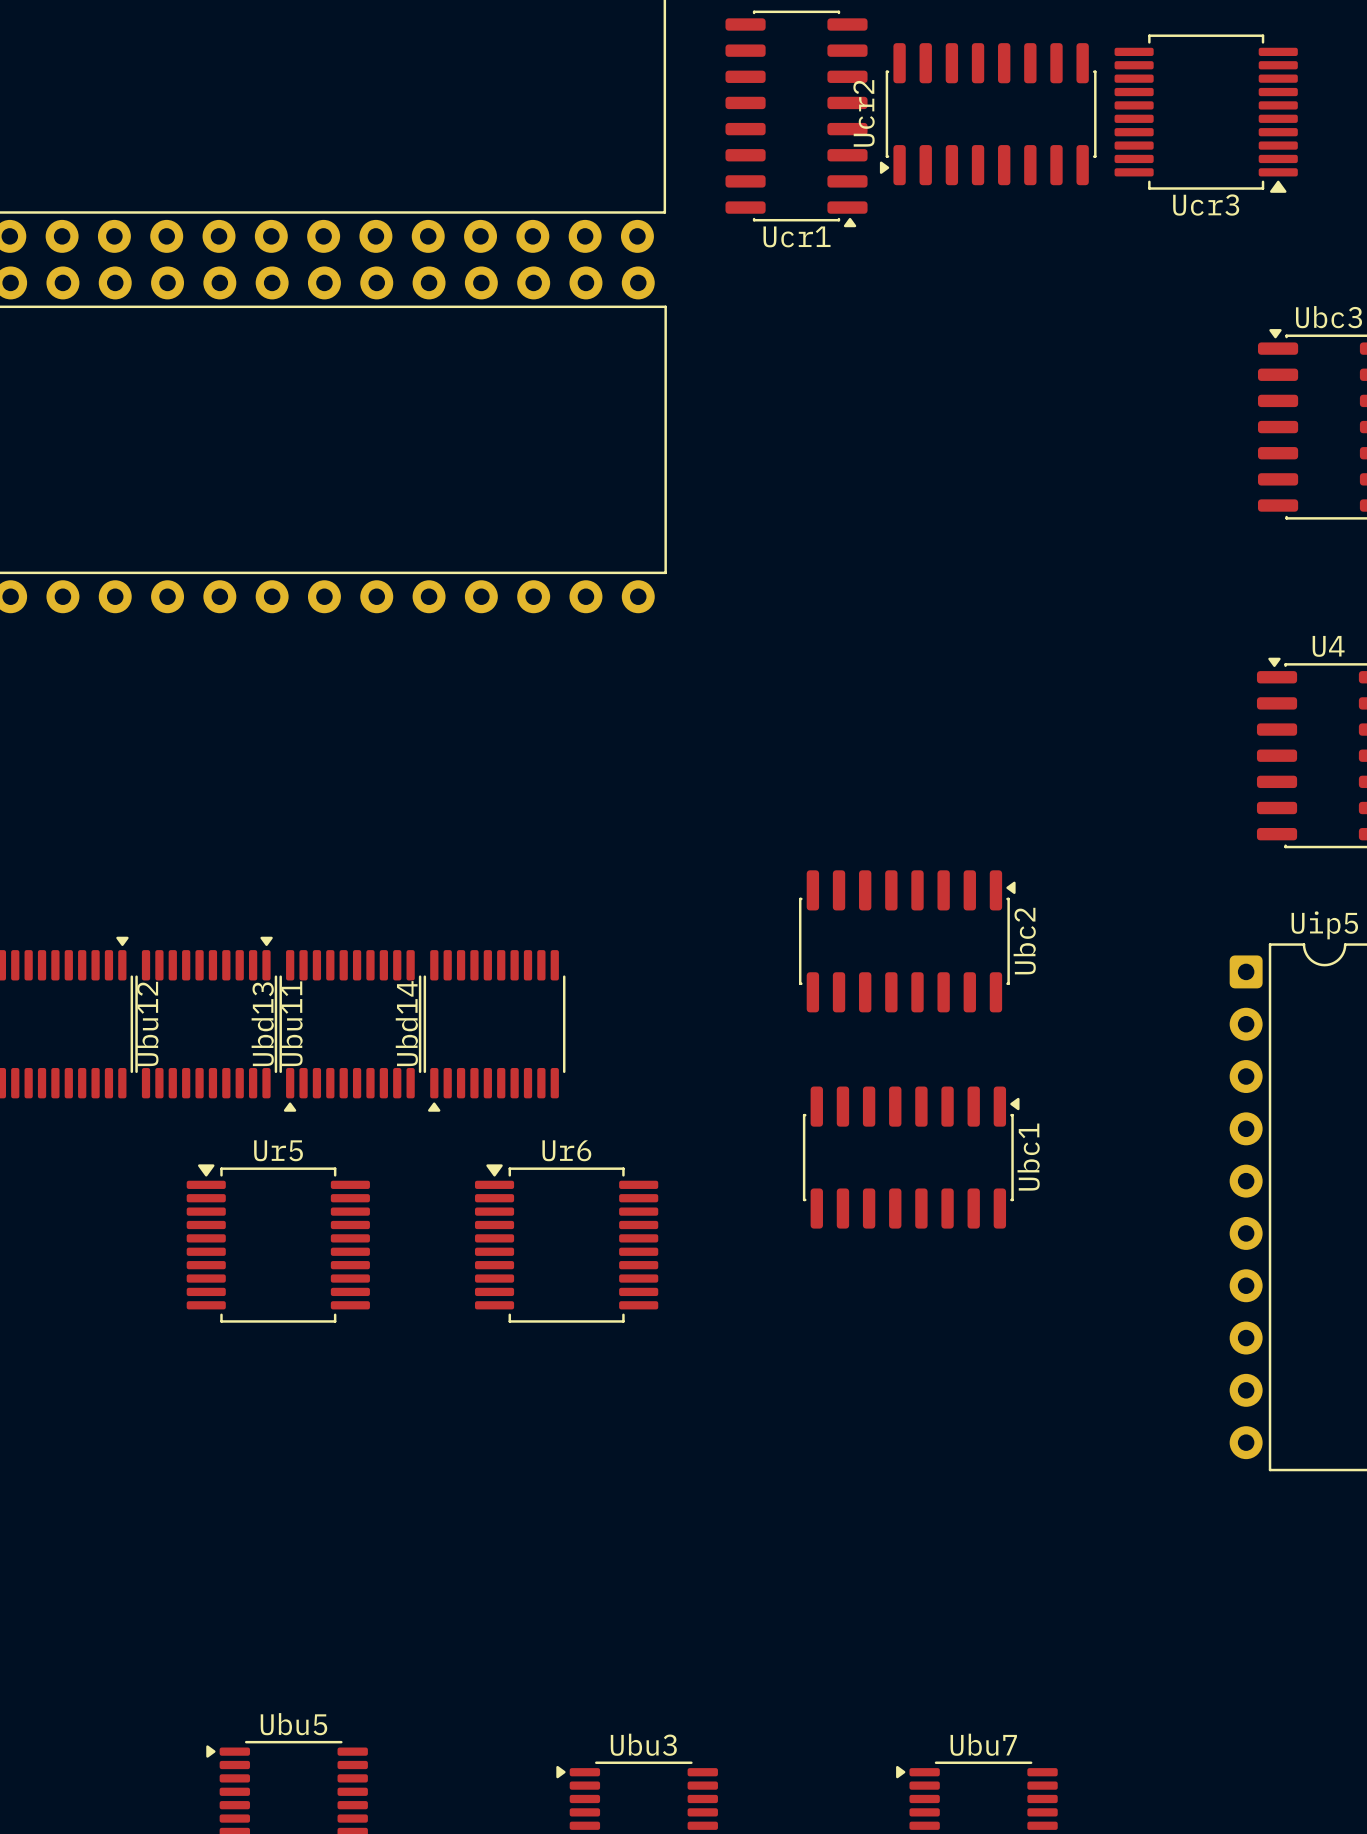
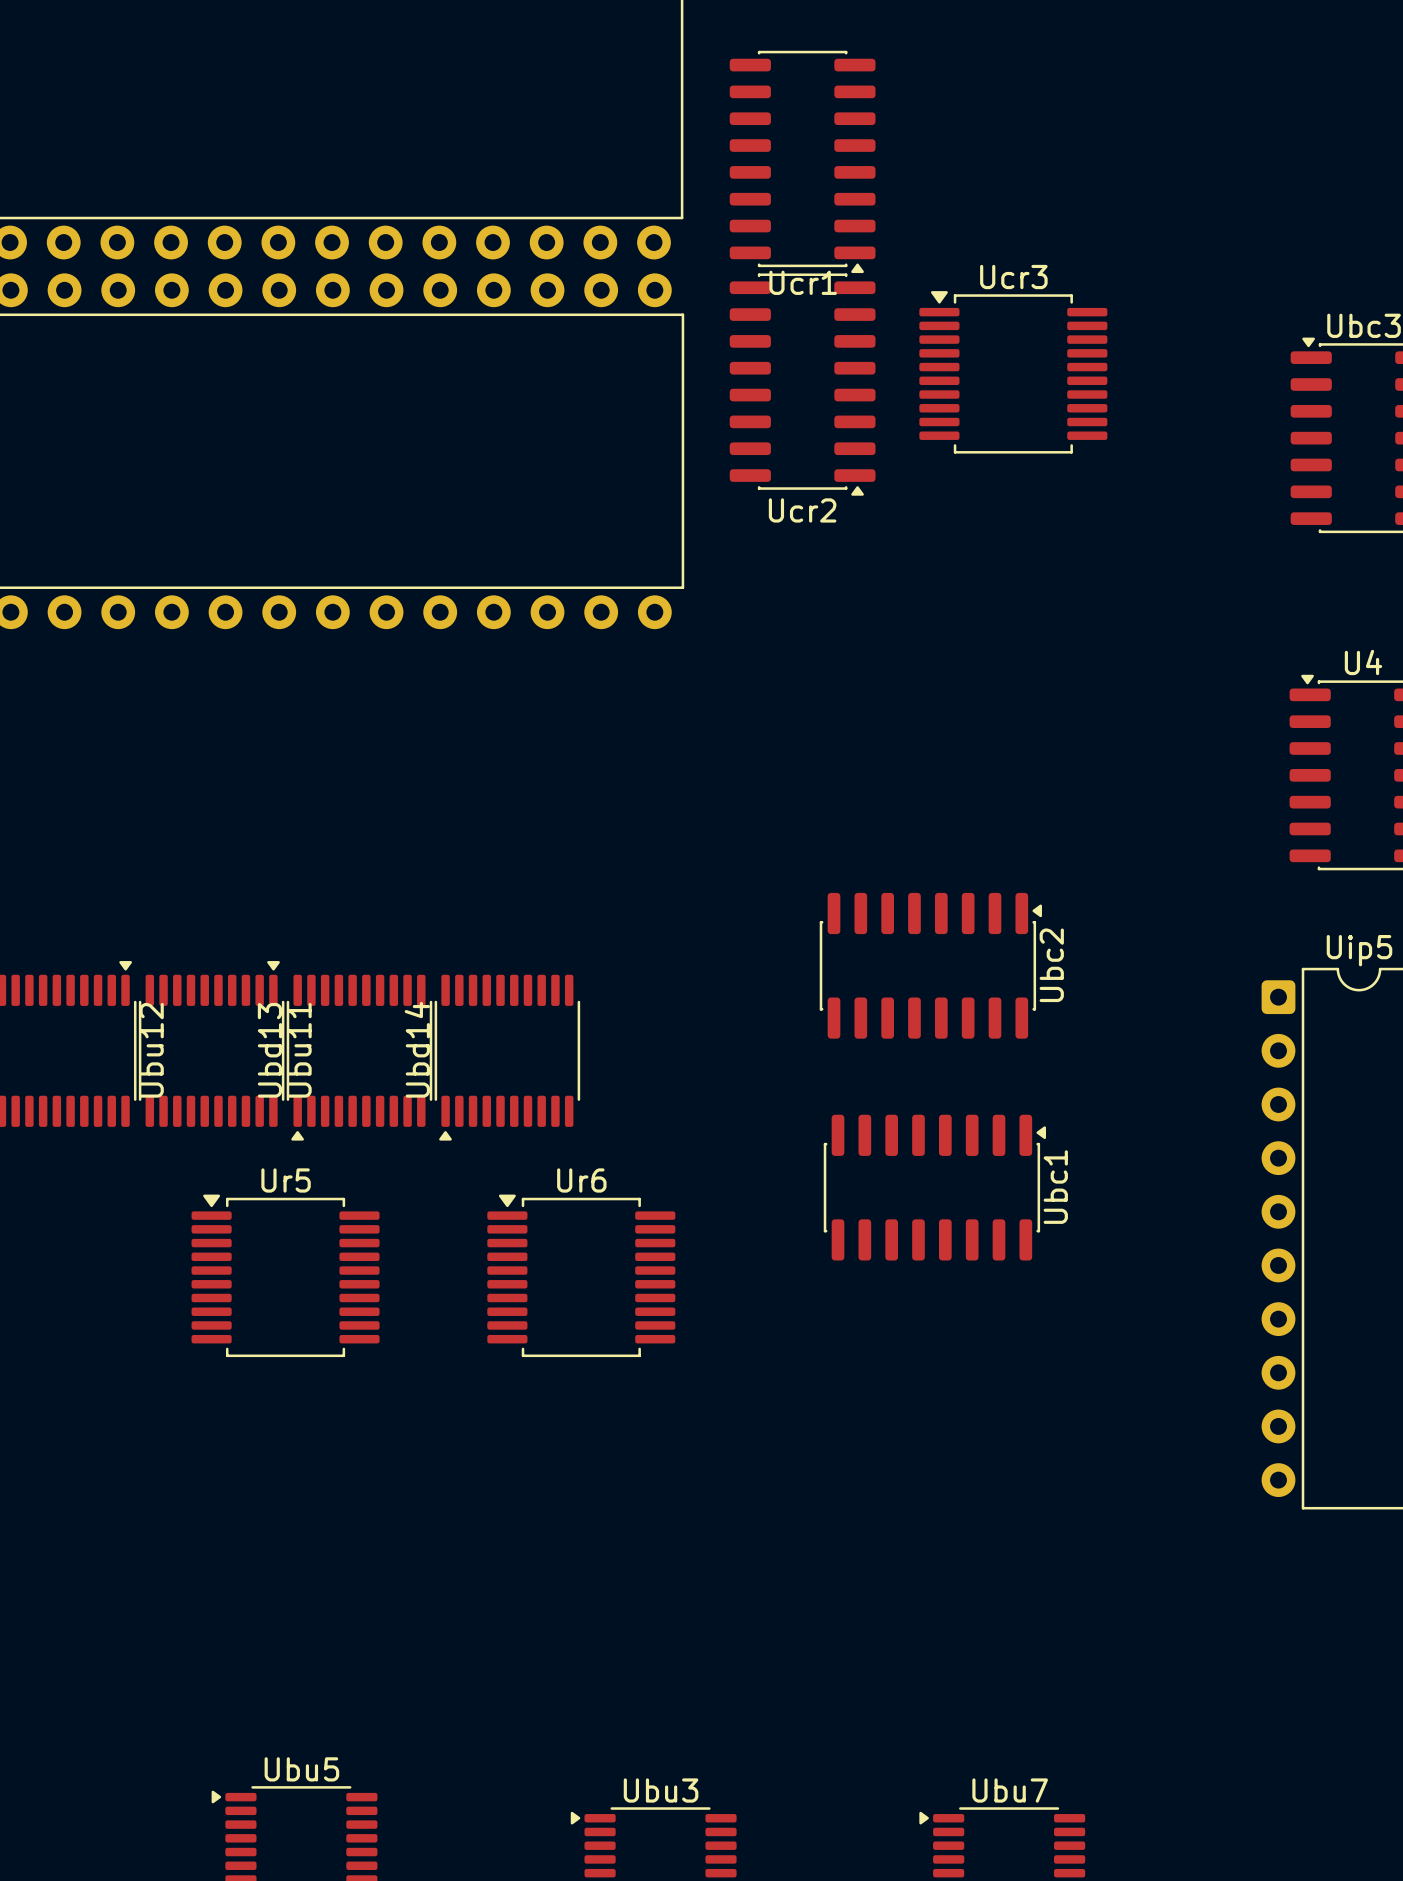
Ucr3 rotation: 0° (1206, 113) -> 180° (1013, 372)
Ucr3 position: (1206, 113) -> (1013, 372)
Ucr2 rotation: 0° (988, 114) -> 90° counterclockwise (802, 384)
Ucr2 position: (988, 114) -> (802, 384)
Ucr1 position: (796, 118) -> (802, 161)

